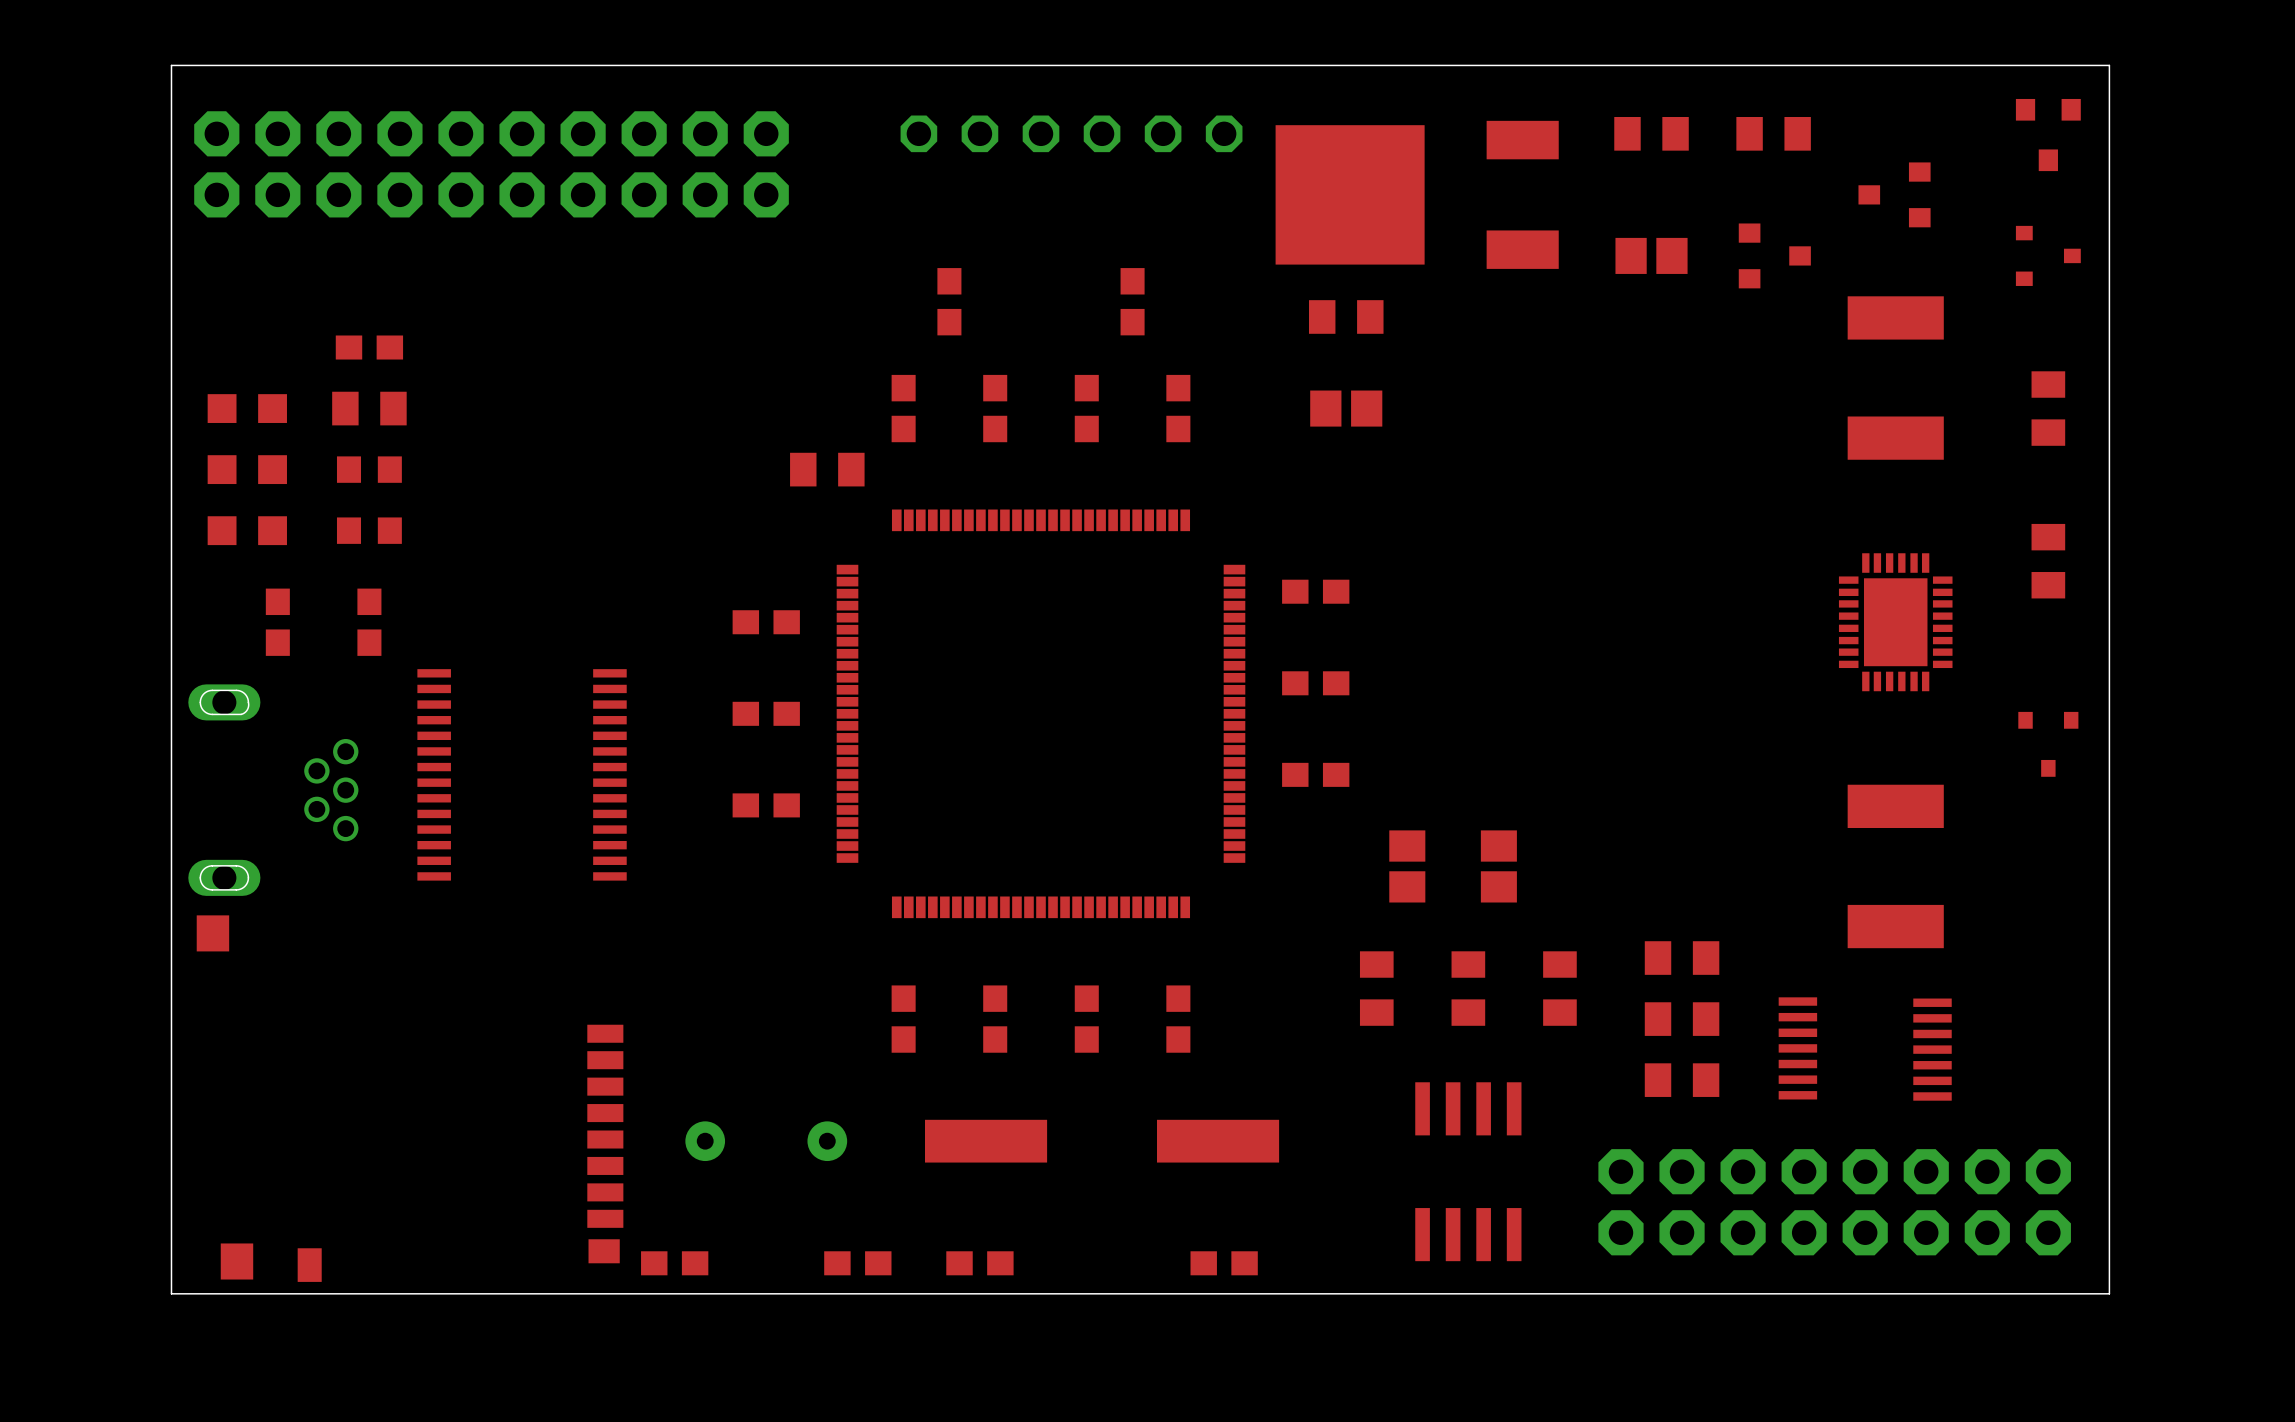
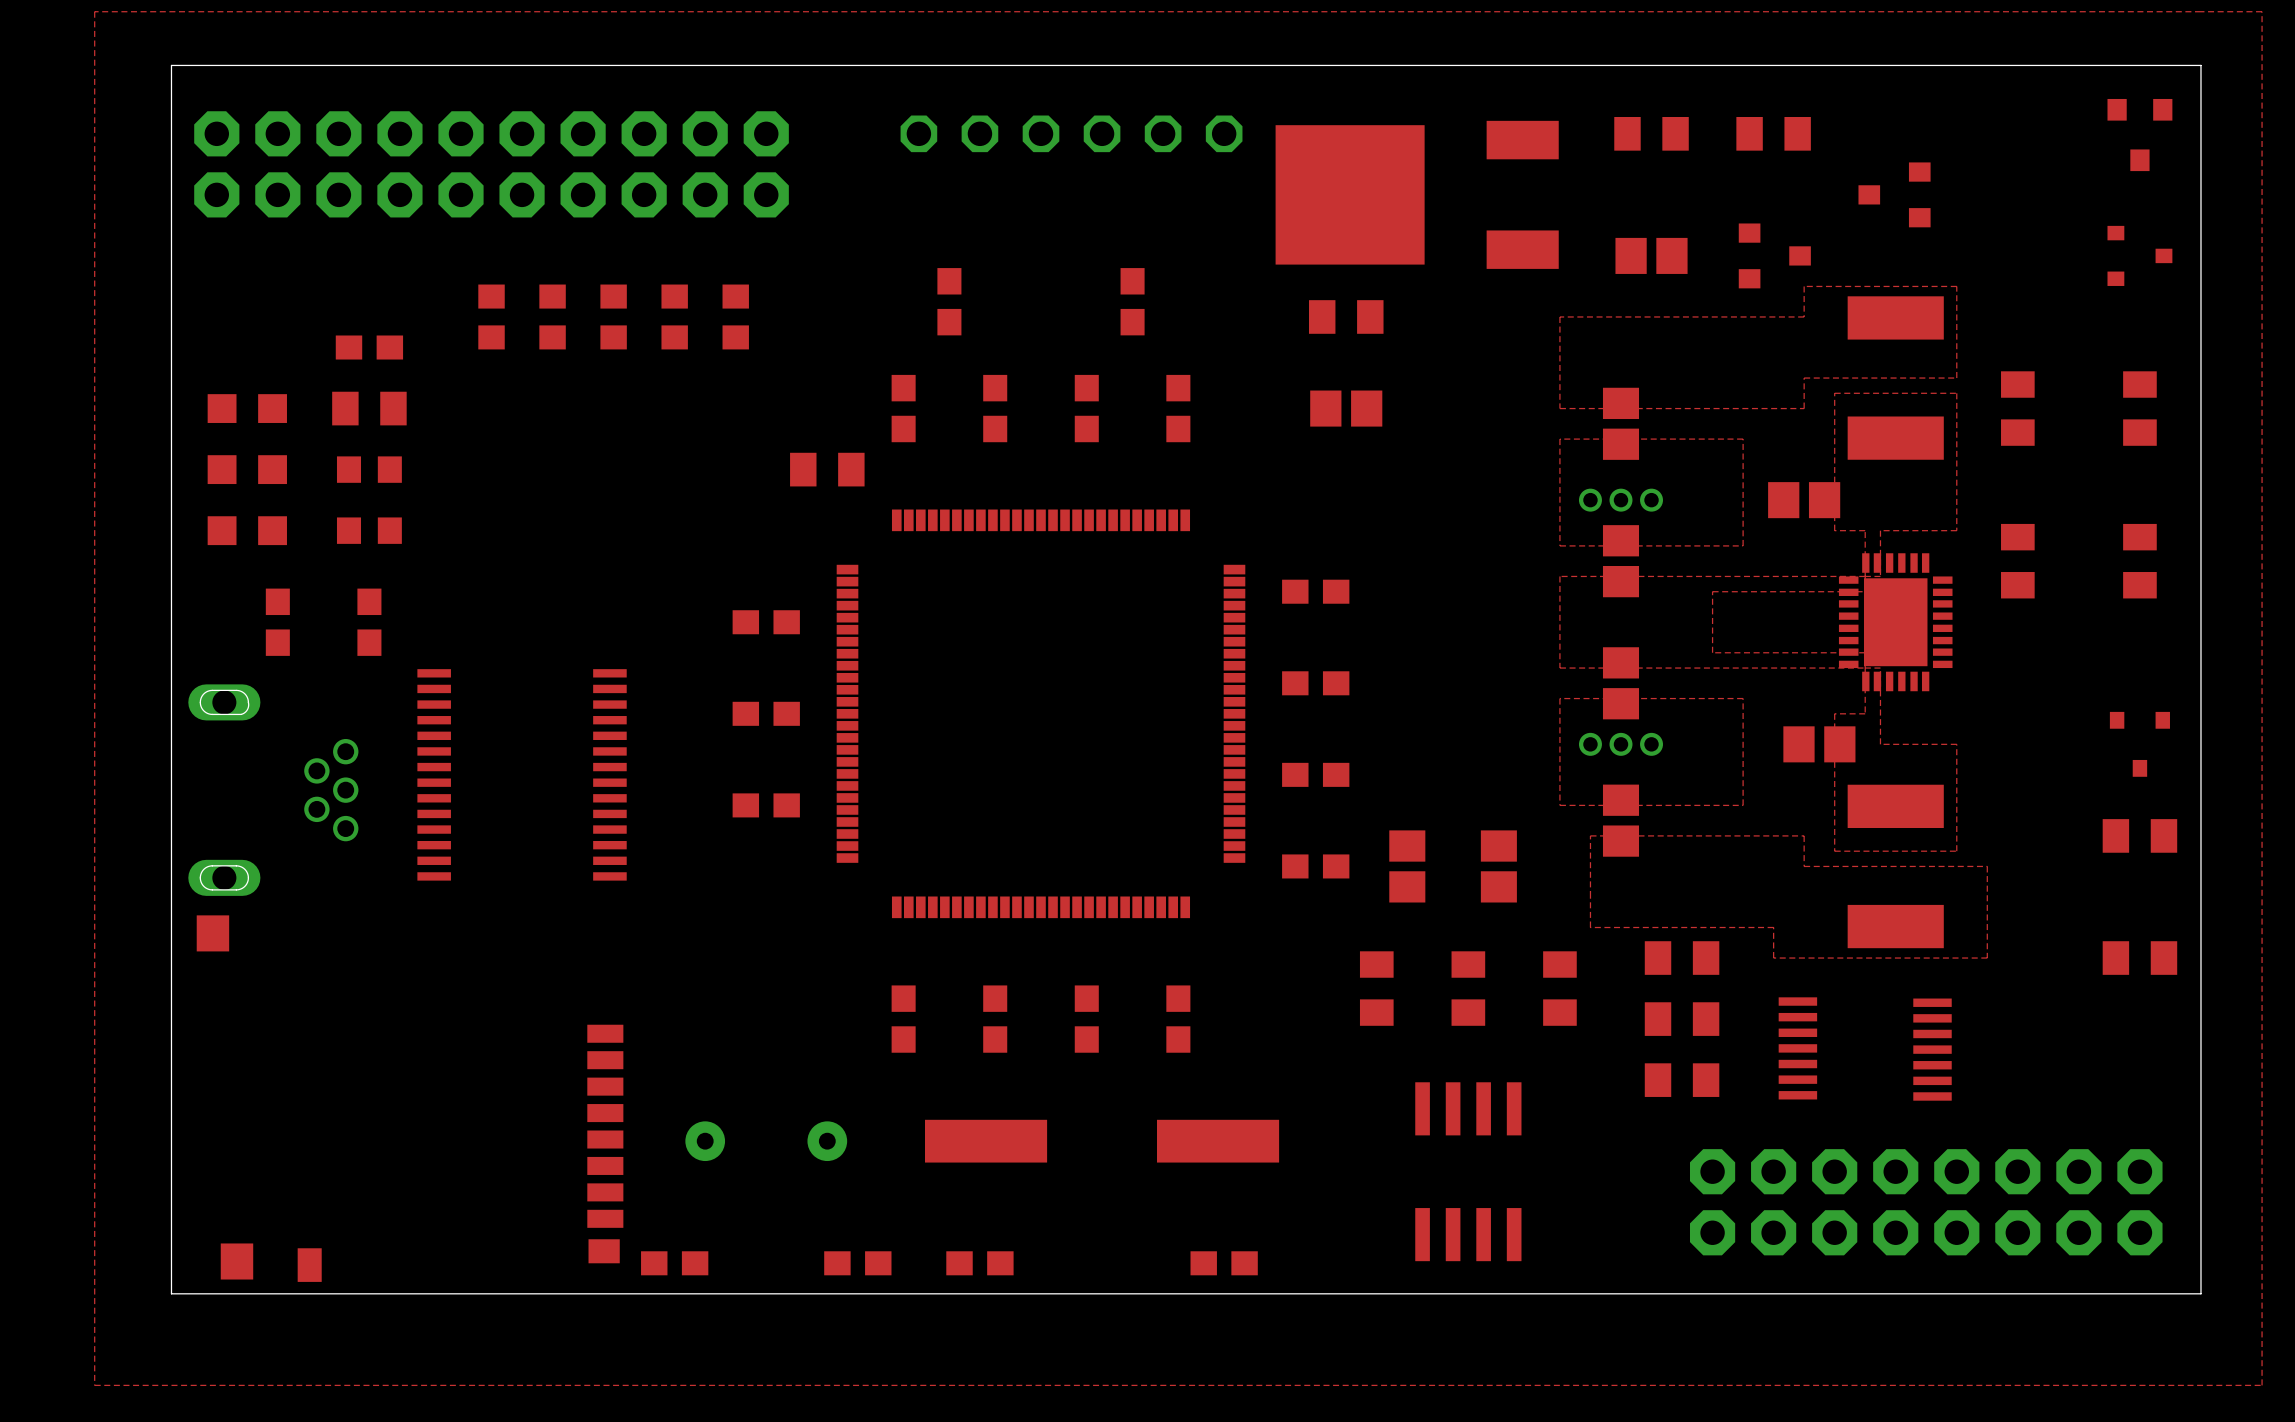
top zone outline: none -> (2262, 11) (94, 11) (94, 1385) (2262, 1385) (2262, 11)
board edge: (2109, 65) (2109, 1293) -> (2109, 65) (2200, 65) (2200, 1293) (2109, 1293)
part position: (2048, 135) -> (2139, 135)
part position: (2048, 255) -> (2139, 255)
top zone outline: none -> (1956, 286) (1956, 378) (1804, 378) (1804, 408) (1559, 408) (1559, 316) (1804, 316) (1804, 286) (1956, 286)
part: none -> (491, 316)
part: none -> (552, 316)
part: none -> (613, 316)
part: none -> (674, 316)
part: none -> (735, 316)
top zone outline: none -> (1956, 393) (1956, 530) (1880, 530) (1880, 576) (1559, 576) (1559, 668) (1880, 668) (1880, 744) (1956, 744) (1956, 851) (1834, 851) (1834, 713) (1865, 713) (1865, 652) (1712, 652) (1712, 591) (1865, 591) (1865, 530) (1834, 530) (1834, 393) (1956, 393)
part position: (2048, 408) -> (2017, 408)
part: none -> (2139, 408)
part: none -> (1620, 423)
top zone outline: none -> (1743, 439) (1743, 545) (1559, 545) (1559, 439) (1743, 439)
via: none -> (1590, 500)
via: none -> (1620, 500)
via: none -> (1651, 500)
part: none -> (1804, 500)
part: none -> (1620, 561)
part position: (2048, 561) -> (2017, 561)
part: none -> (2139, 561)
part: none -> (1620, 683)
top zone outline: none -> (1743, 698) (1559, 698) (1559, 805) (1743, 805) (1743, 698)
via: none -> (1590, 744)
via: none -> (1620, 744)
via: none -> (1651, 744)
part: none -> (1819, 744)
part position: (2048, 744) -> (2139, 744)
part: none -> (1620, 820)
top zone outline: none -> (1804, 835) (1590, 835) (1590, 927) (1773, 927) (1773, 958) (1987, 958) (1987, 866) (1804, 866) (1804, 835)
part: none -> (2139, 835)
part: none -> (1315, 866)
part: none -> (2139, 958)
part position: (1834, 1202) -> (1926, 1202)

